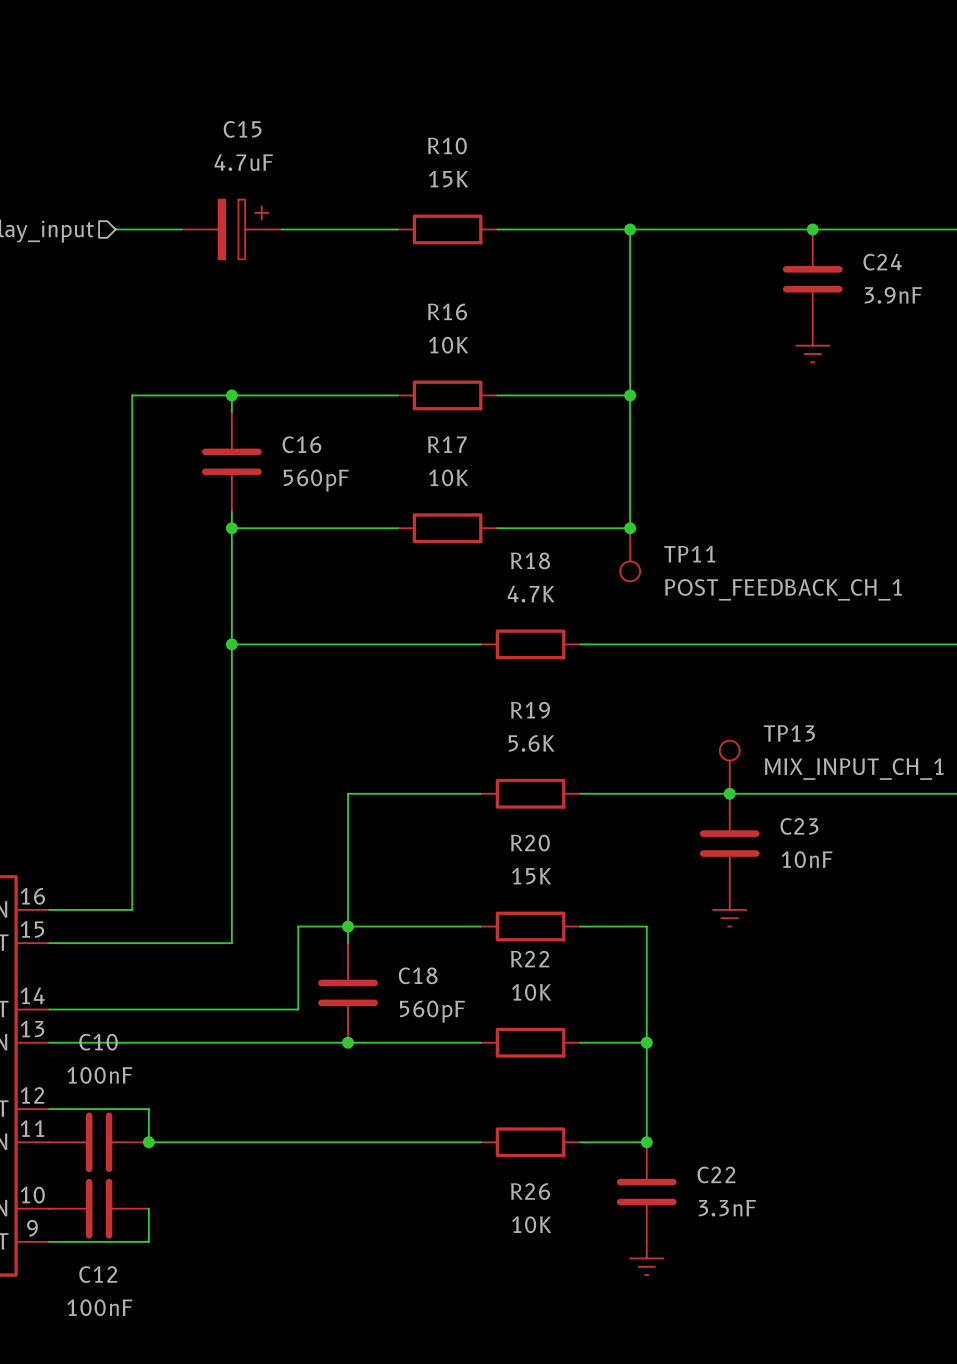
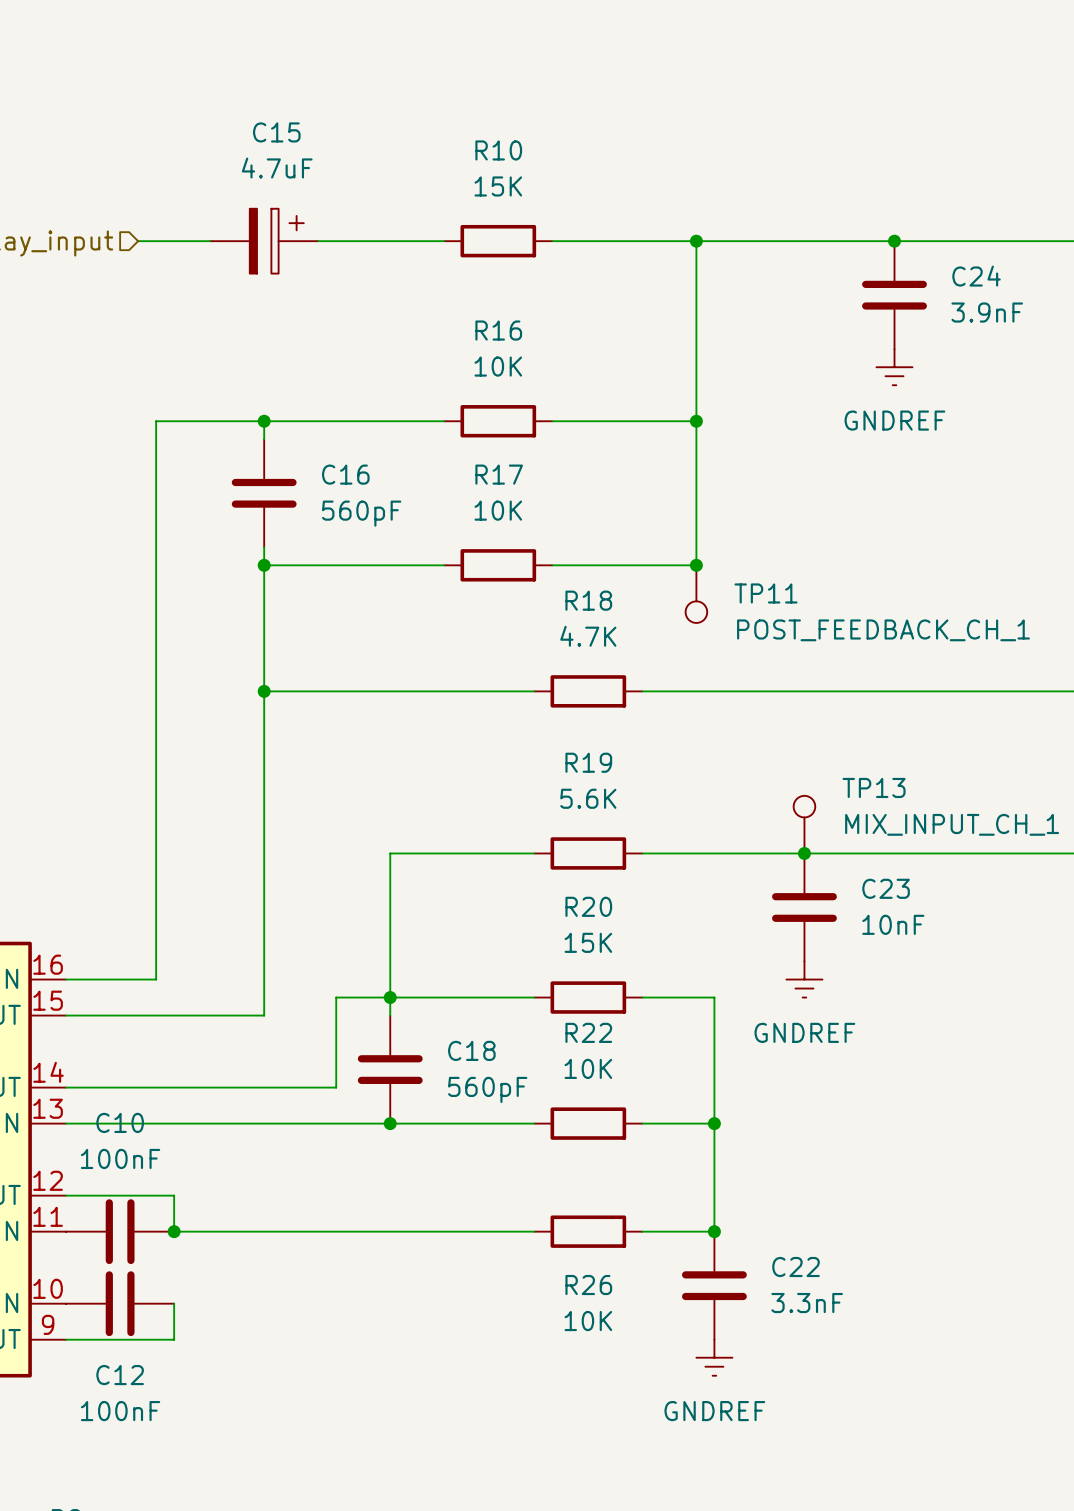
power symbol text: none -> GNDREF (894, 420)
power symbol text: none -> GNDREF (804, 1032)
power symbol text: none -> GNDREF (714, 1411)

